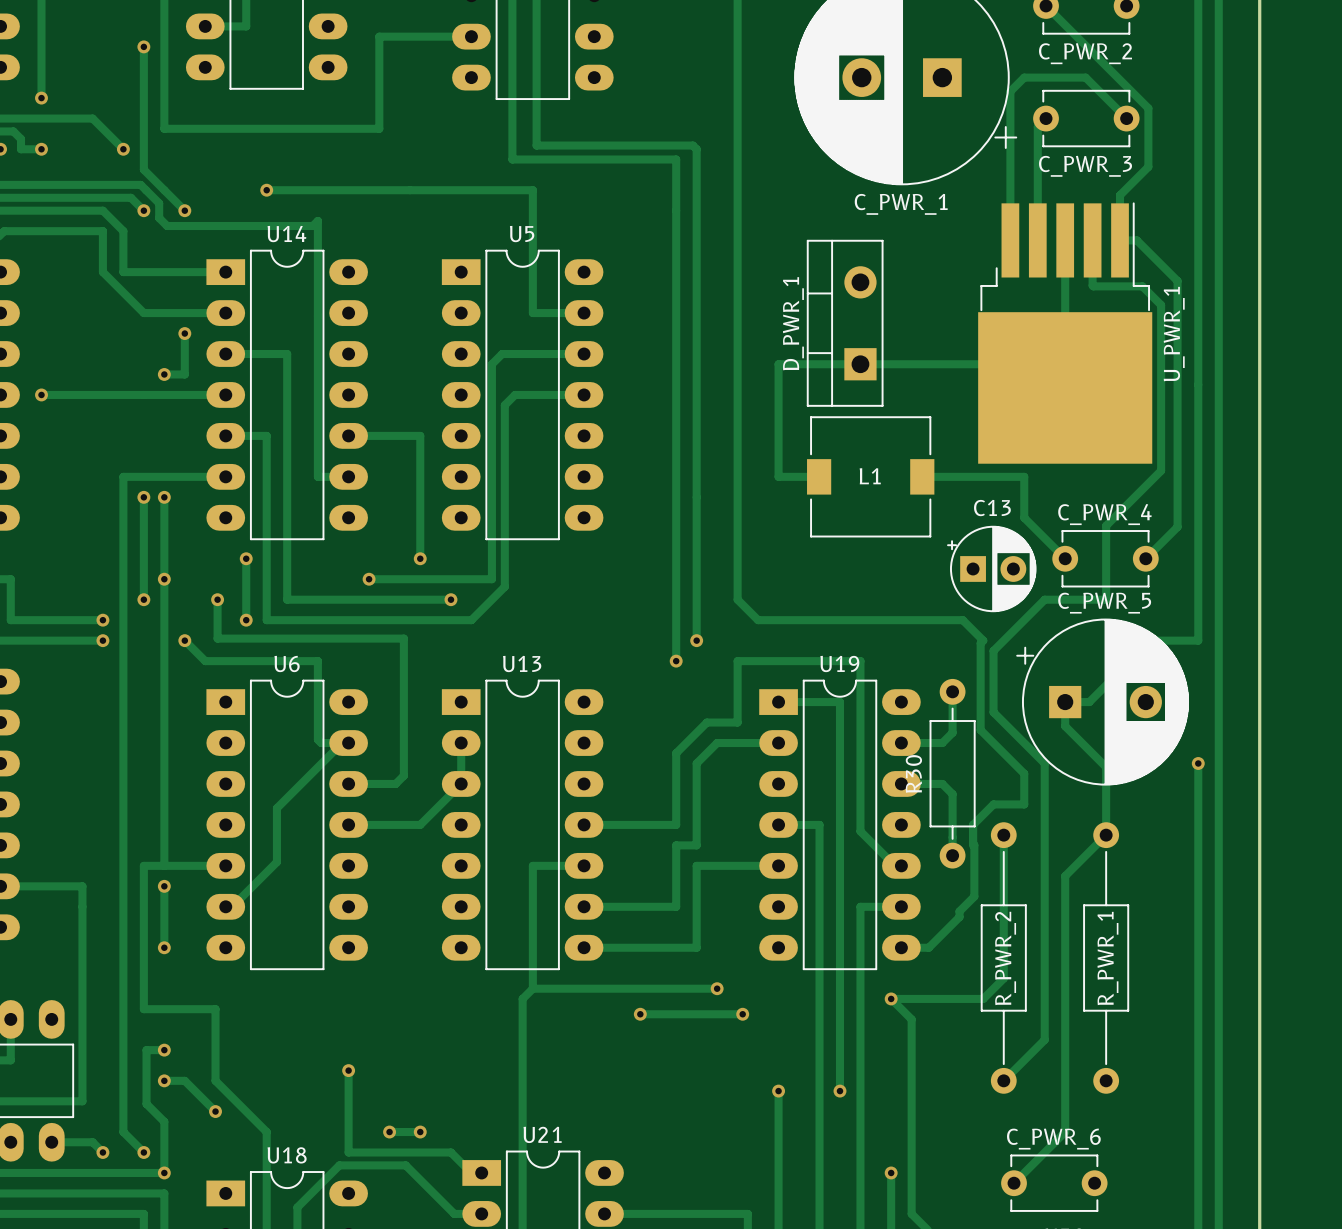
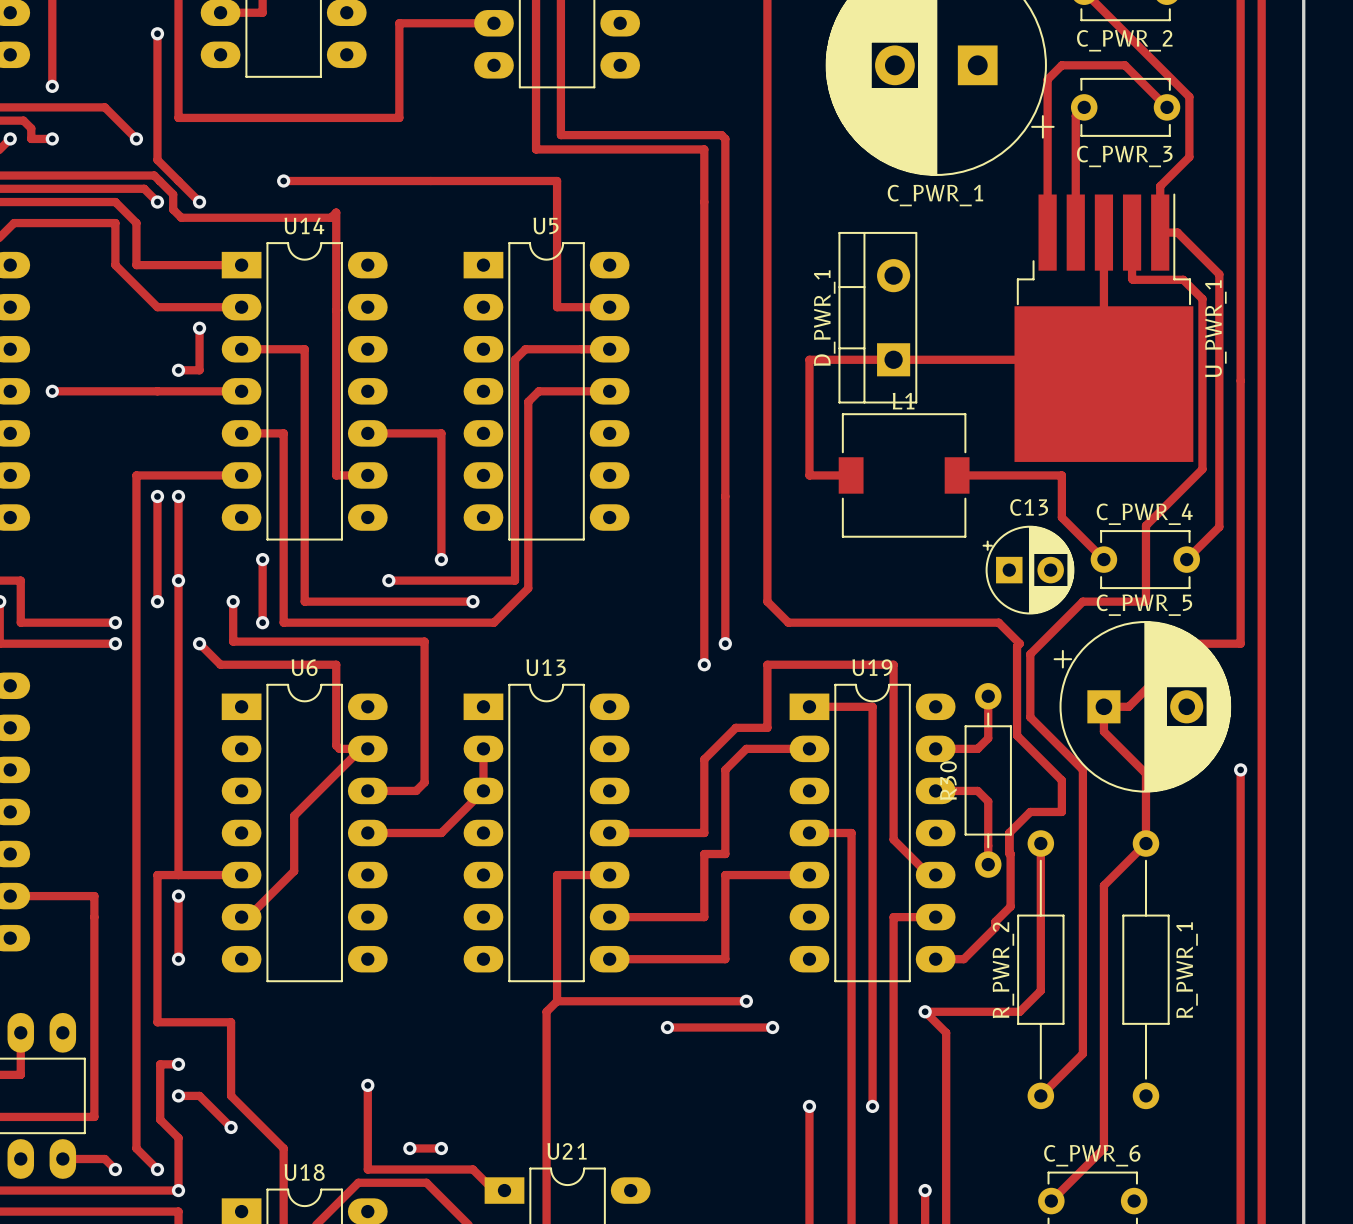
L1 name position: L1 (870, 476) -> L1 (903, 401)
R_PWR_2 name position: R_PWR_2 (1005, 958) -> R_PWR_2 (1003, 970)
R_PWR_1 name position: R_PWR_1 (1107, 958) -> R_PWR_1 (1187, 970)

